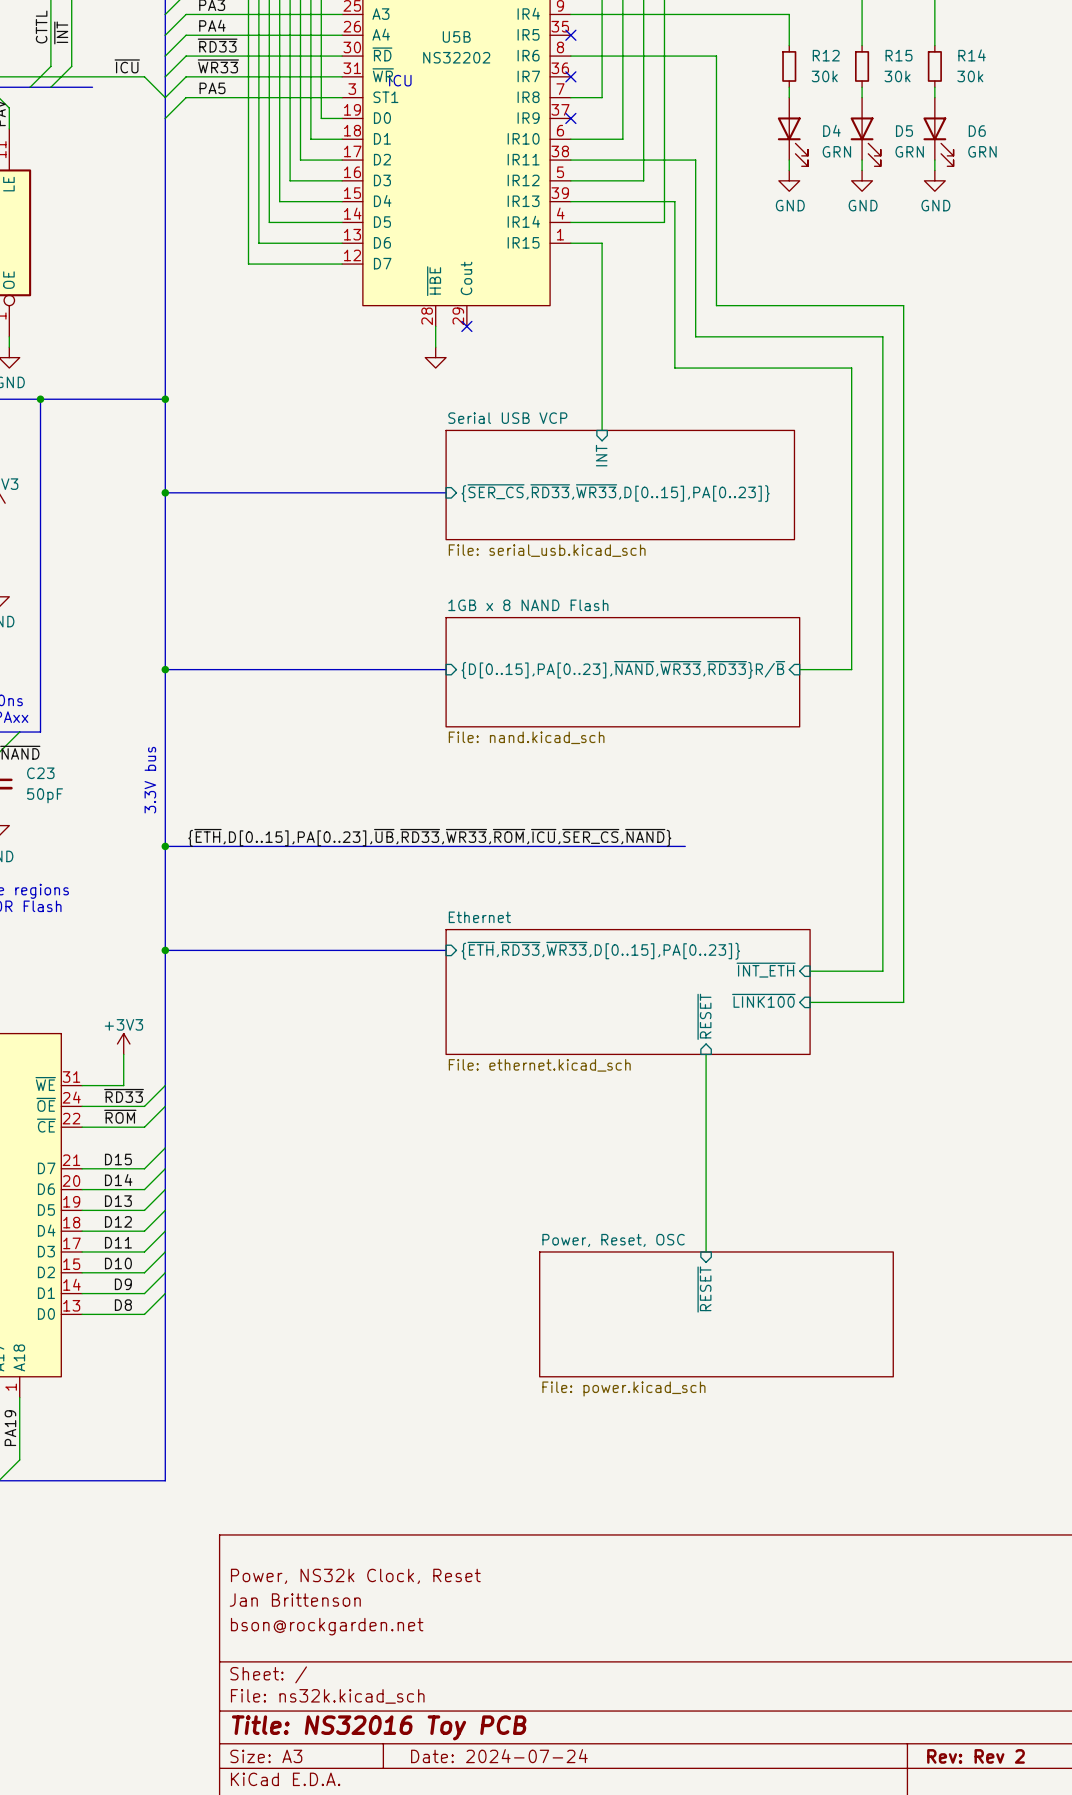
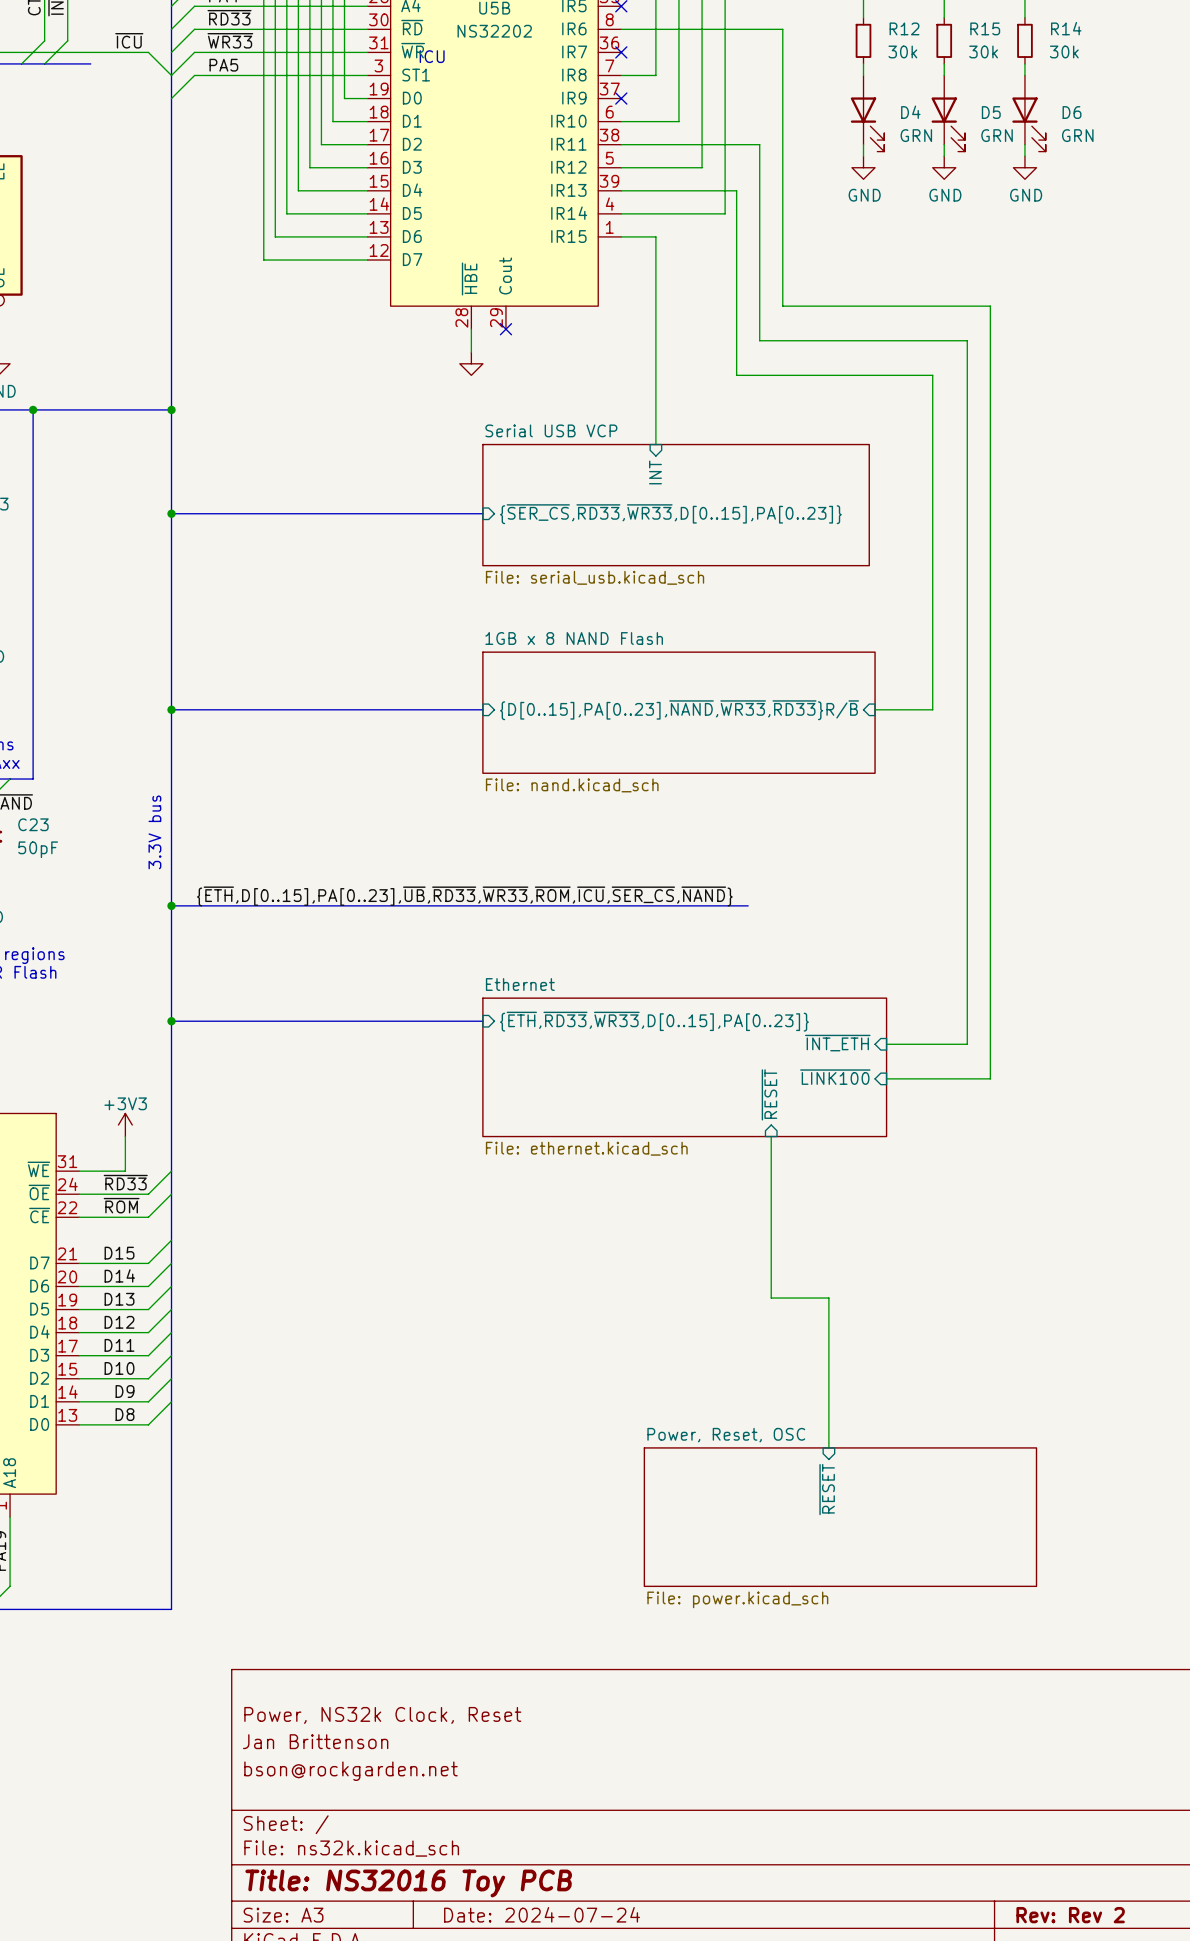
wire: (706, 1199) (706, 1251) -> (771, 1298) (828, 1298) (828, 1447)
sheet pin position: ~{RESET} (704, 1289) -> ~{RESET} (827, 1489)
sheet Power, Reset, OSC position: (716, 1314) -> (840, 1517)

